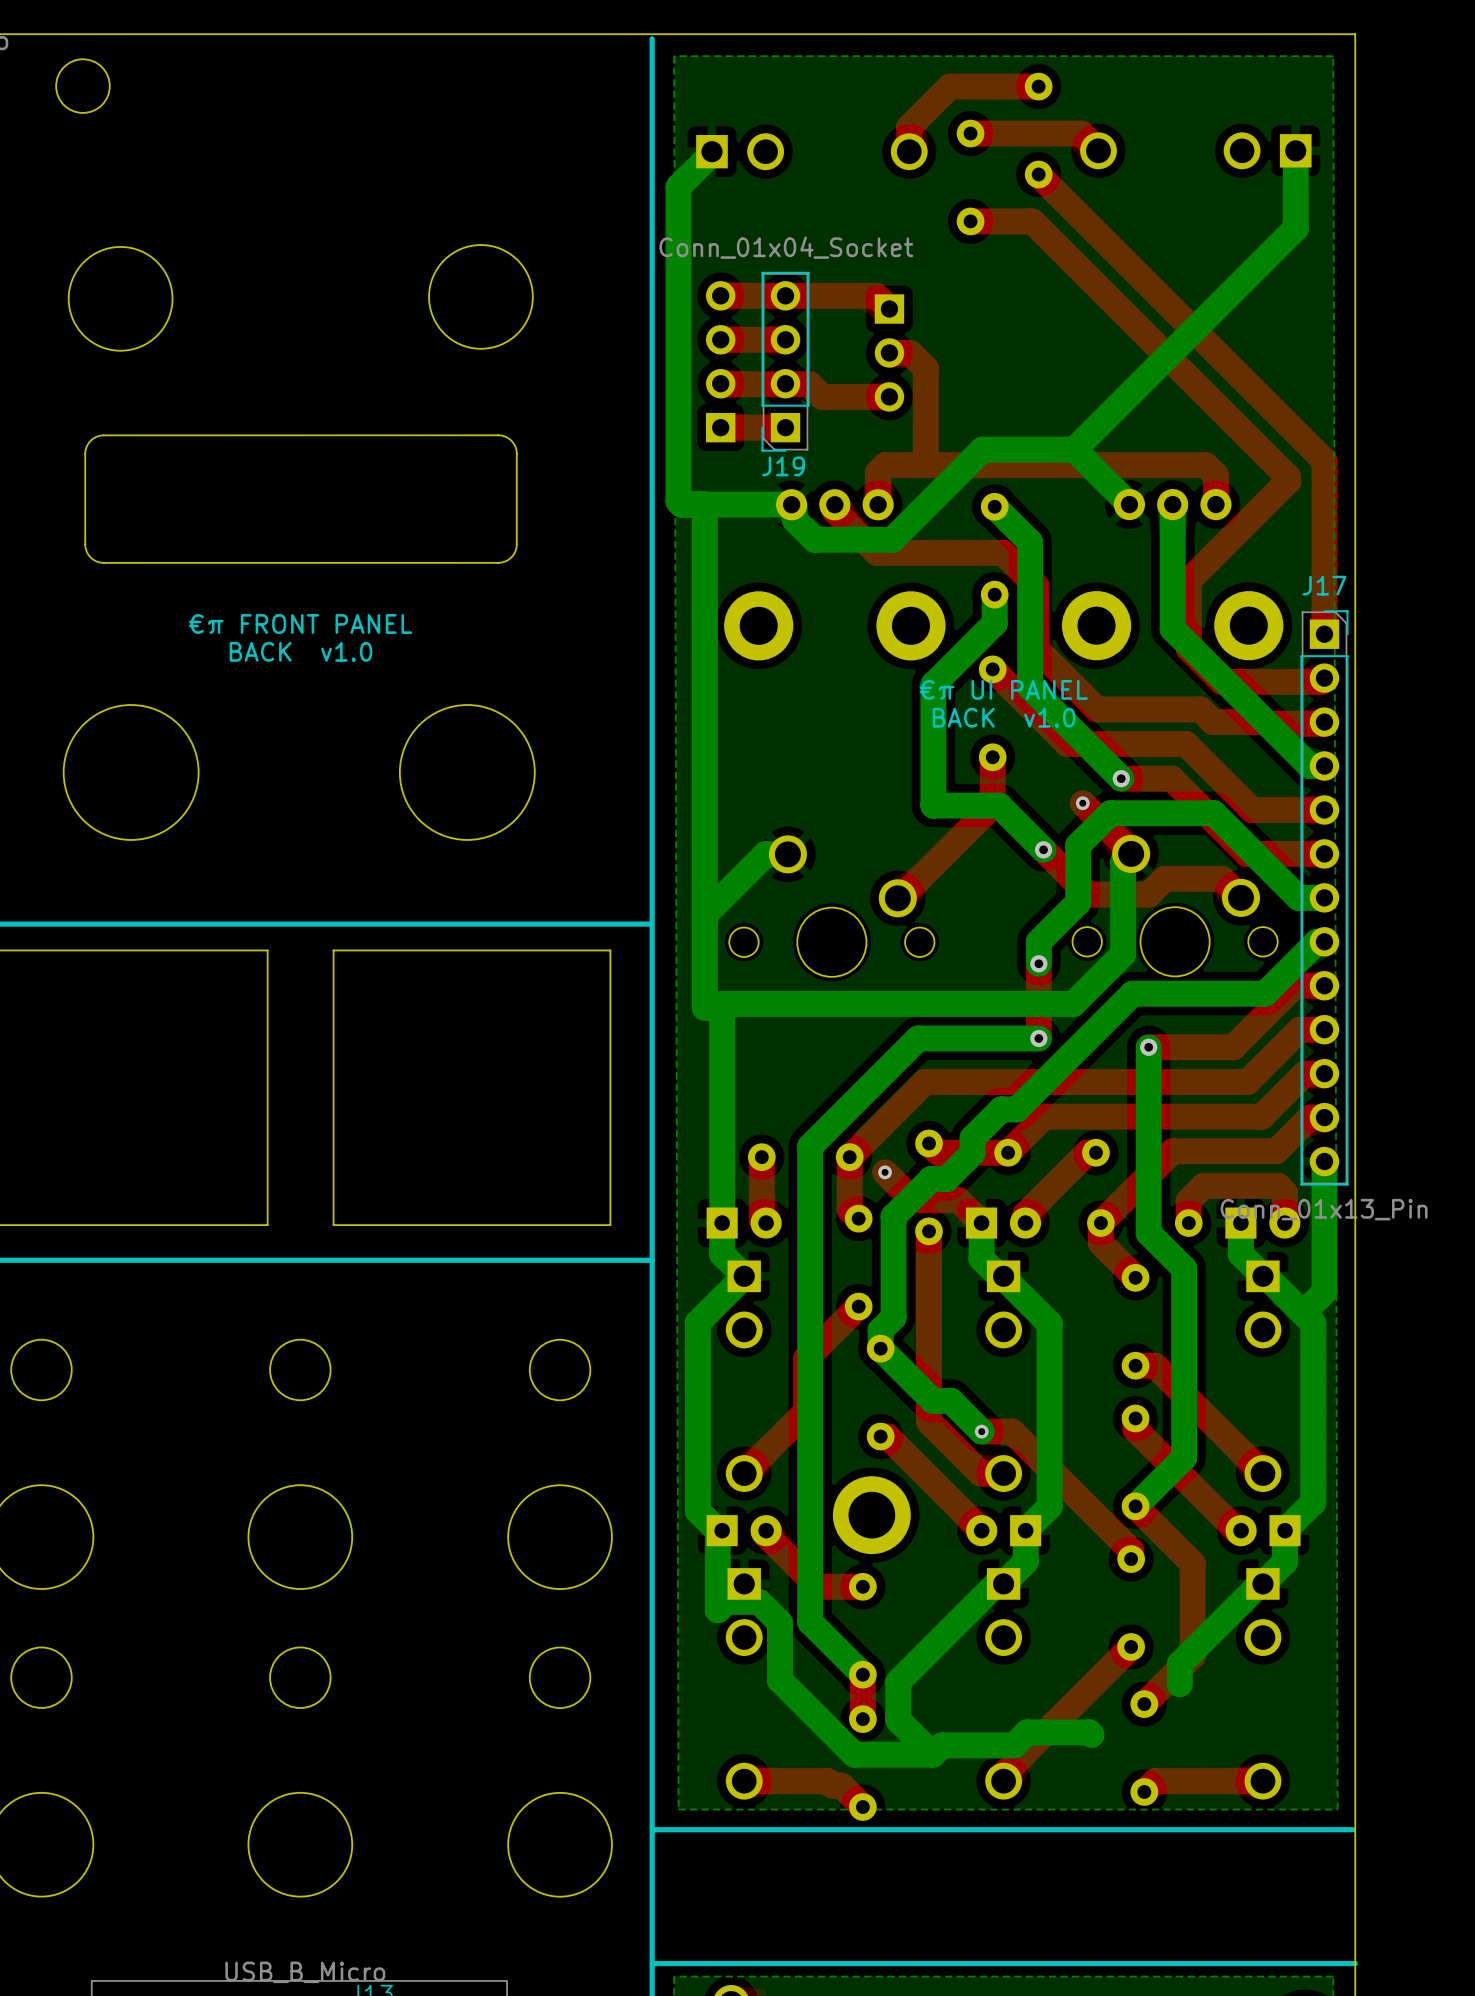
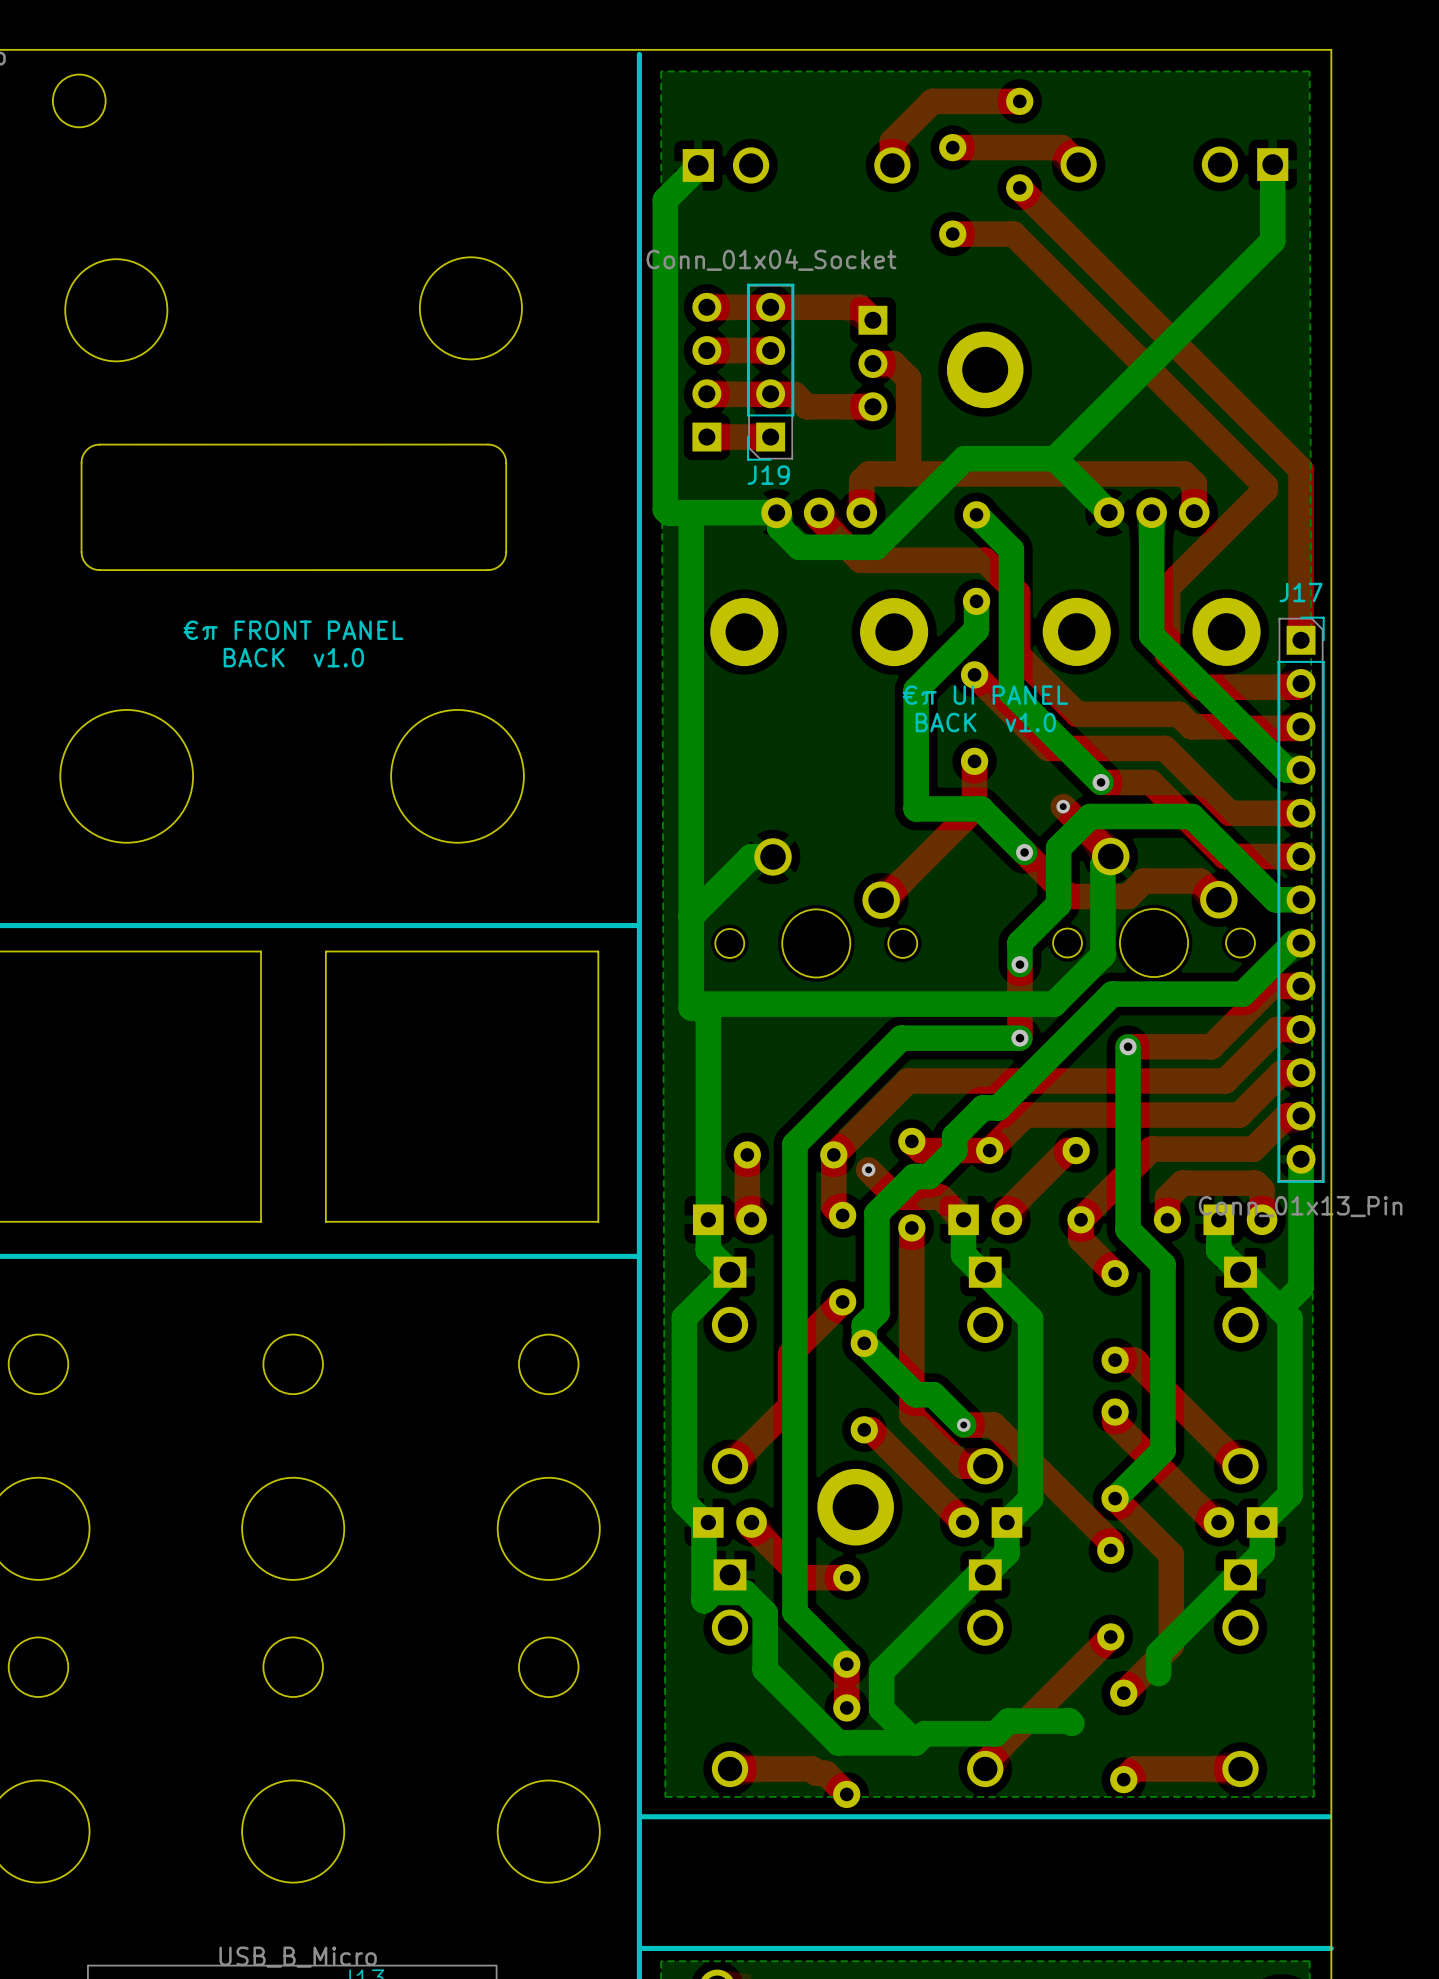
part: none -> (985, 369)

